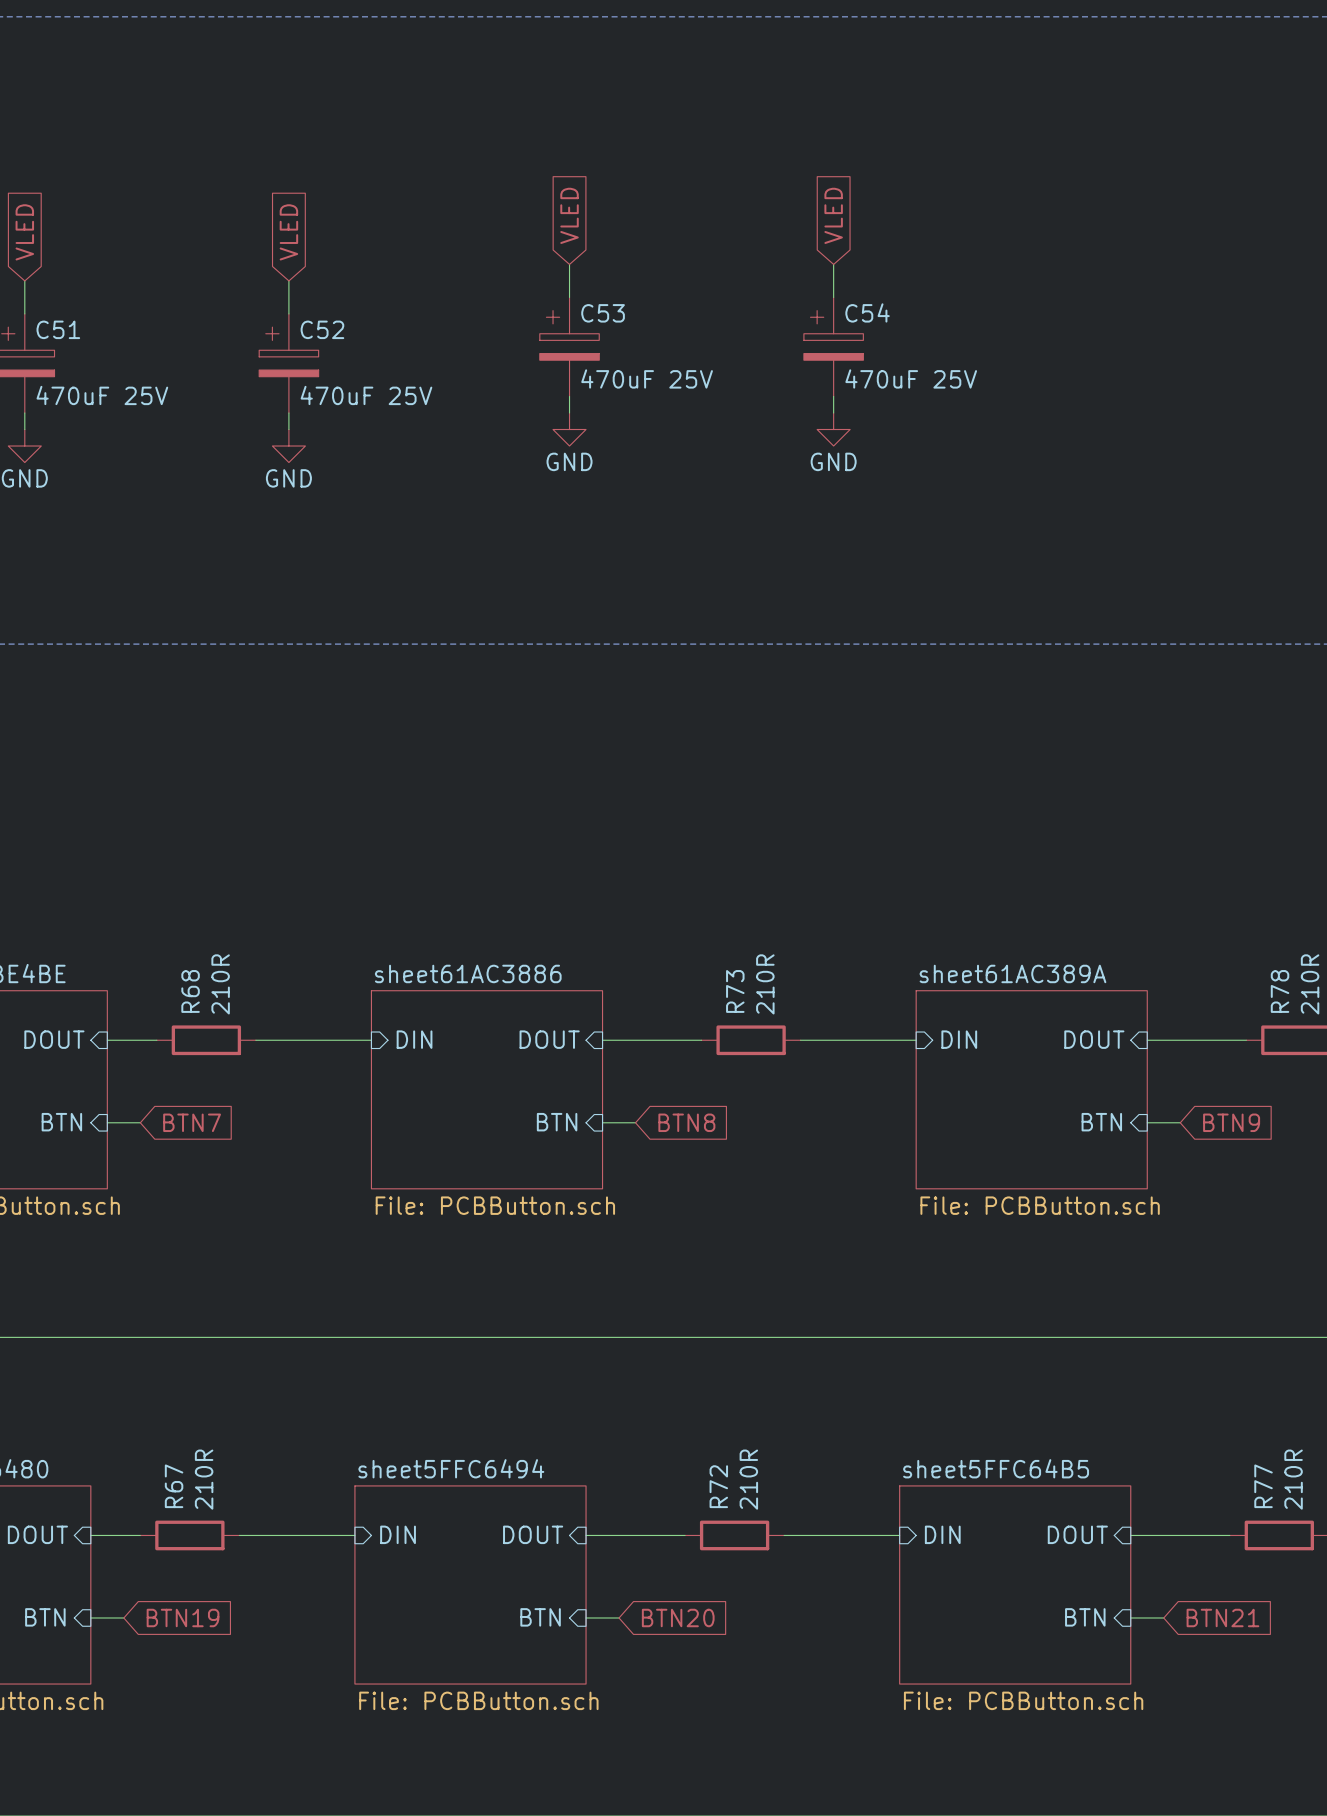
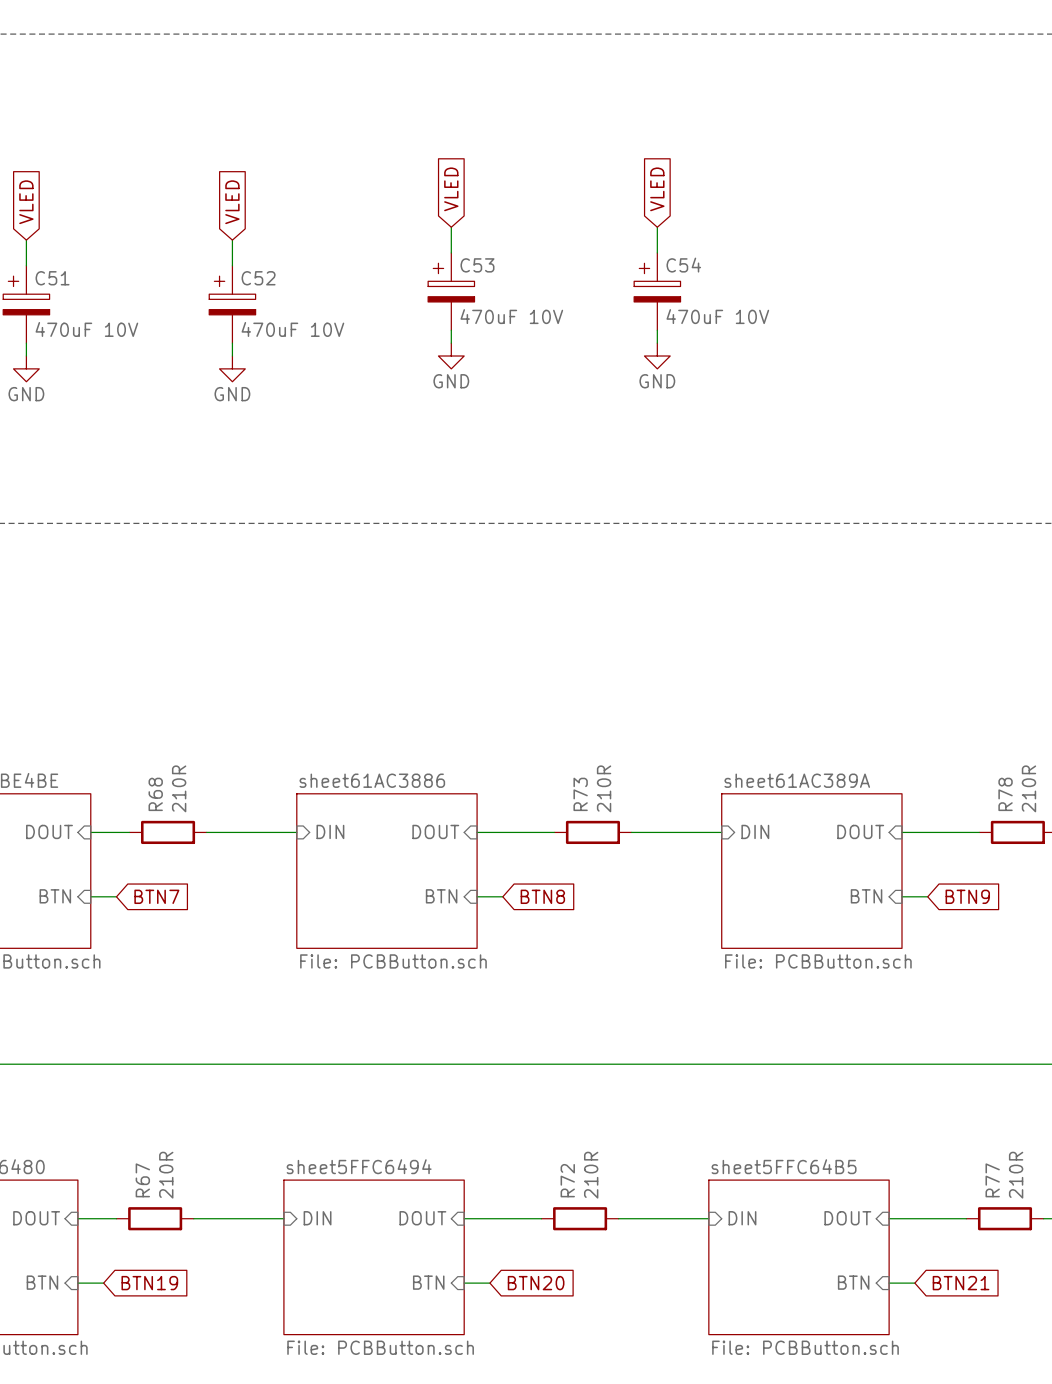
C53 value: 470uF 25V (647, 378) -> 470uF 10V (511, 316)
C54 value: 470uF 25V (911, 378) -> 470uF 10V (717, 316)
C51 value: 470uF 25V (102, 395) -> 470uF 10V (86, 329)
C52 value: 470uF 25V (366, 395) -> 470uF 10V (292, 329)

